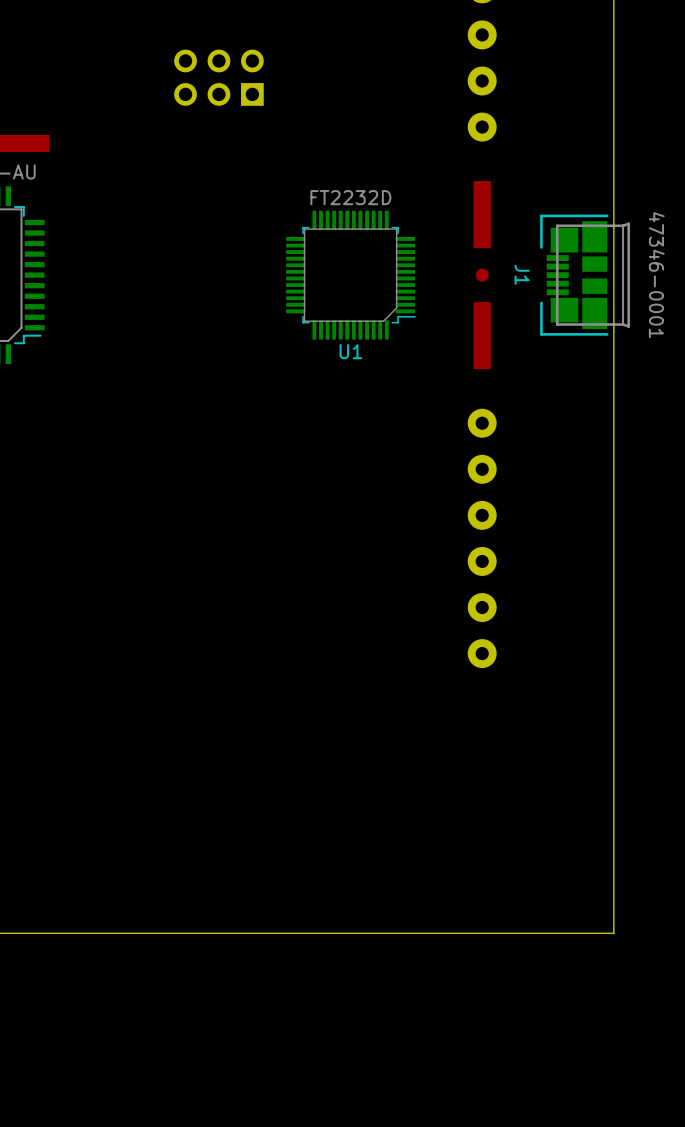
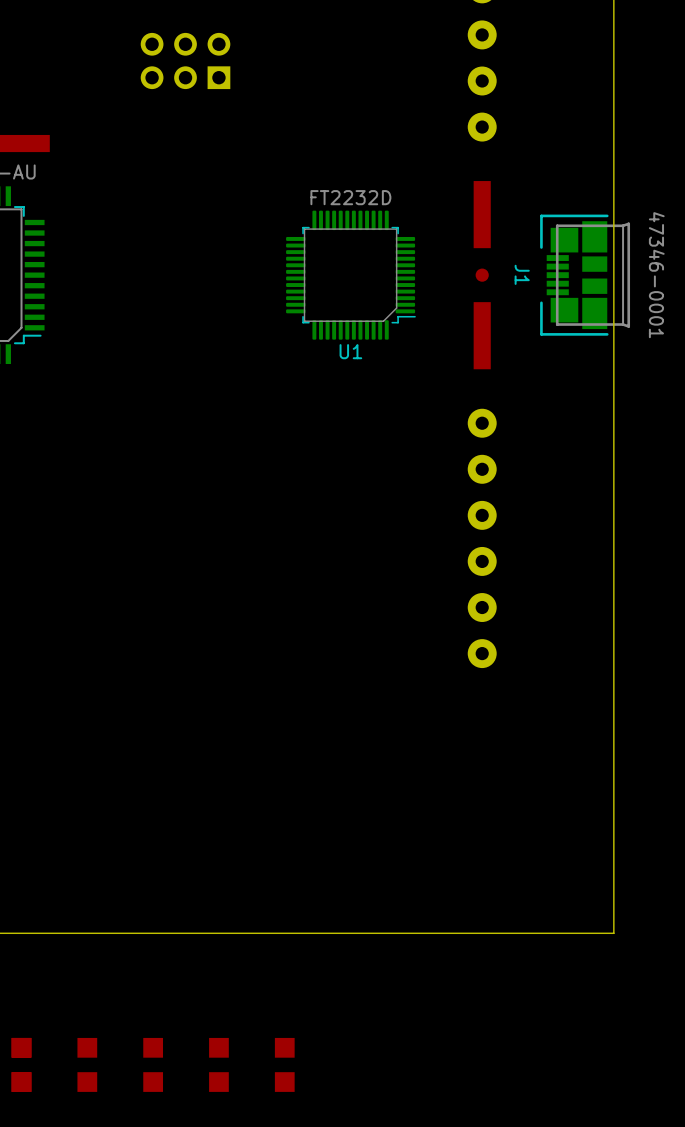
part position: (218, 77) -> (185, 60)
part: none -> (21, 1064)
part: none -> (87, 1064)
part: none -> (153, 1064)
part: none -> (218, 1064)
part: none -> (284, 1064)

